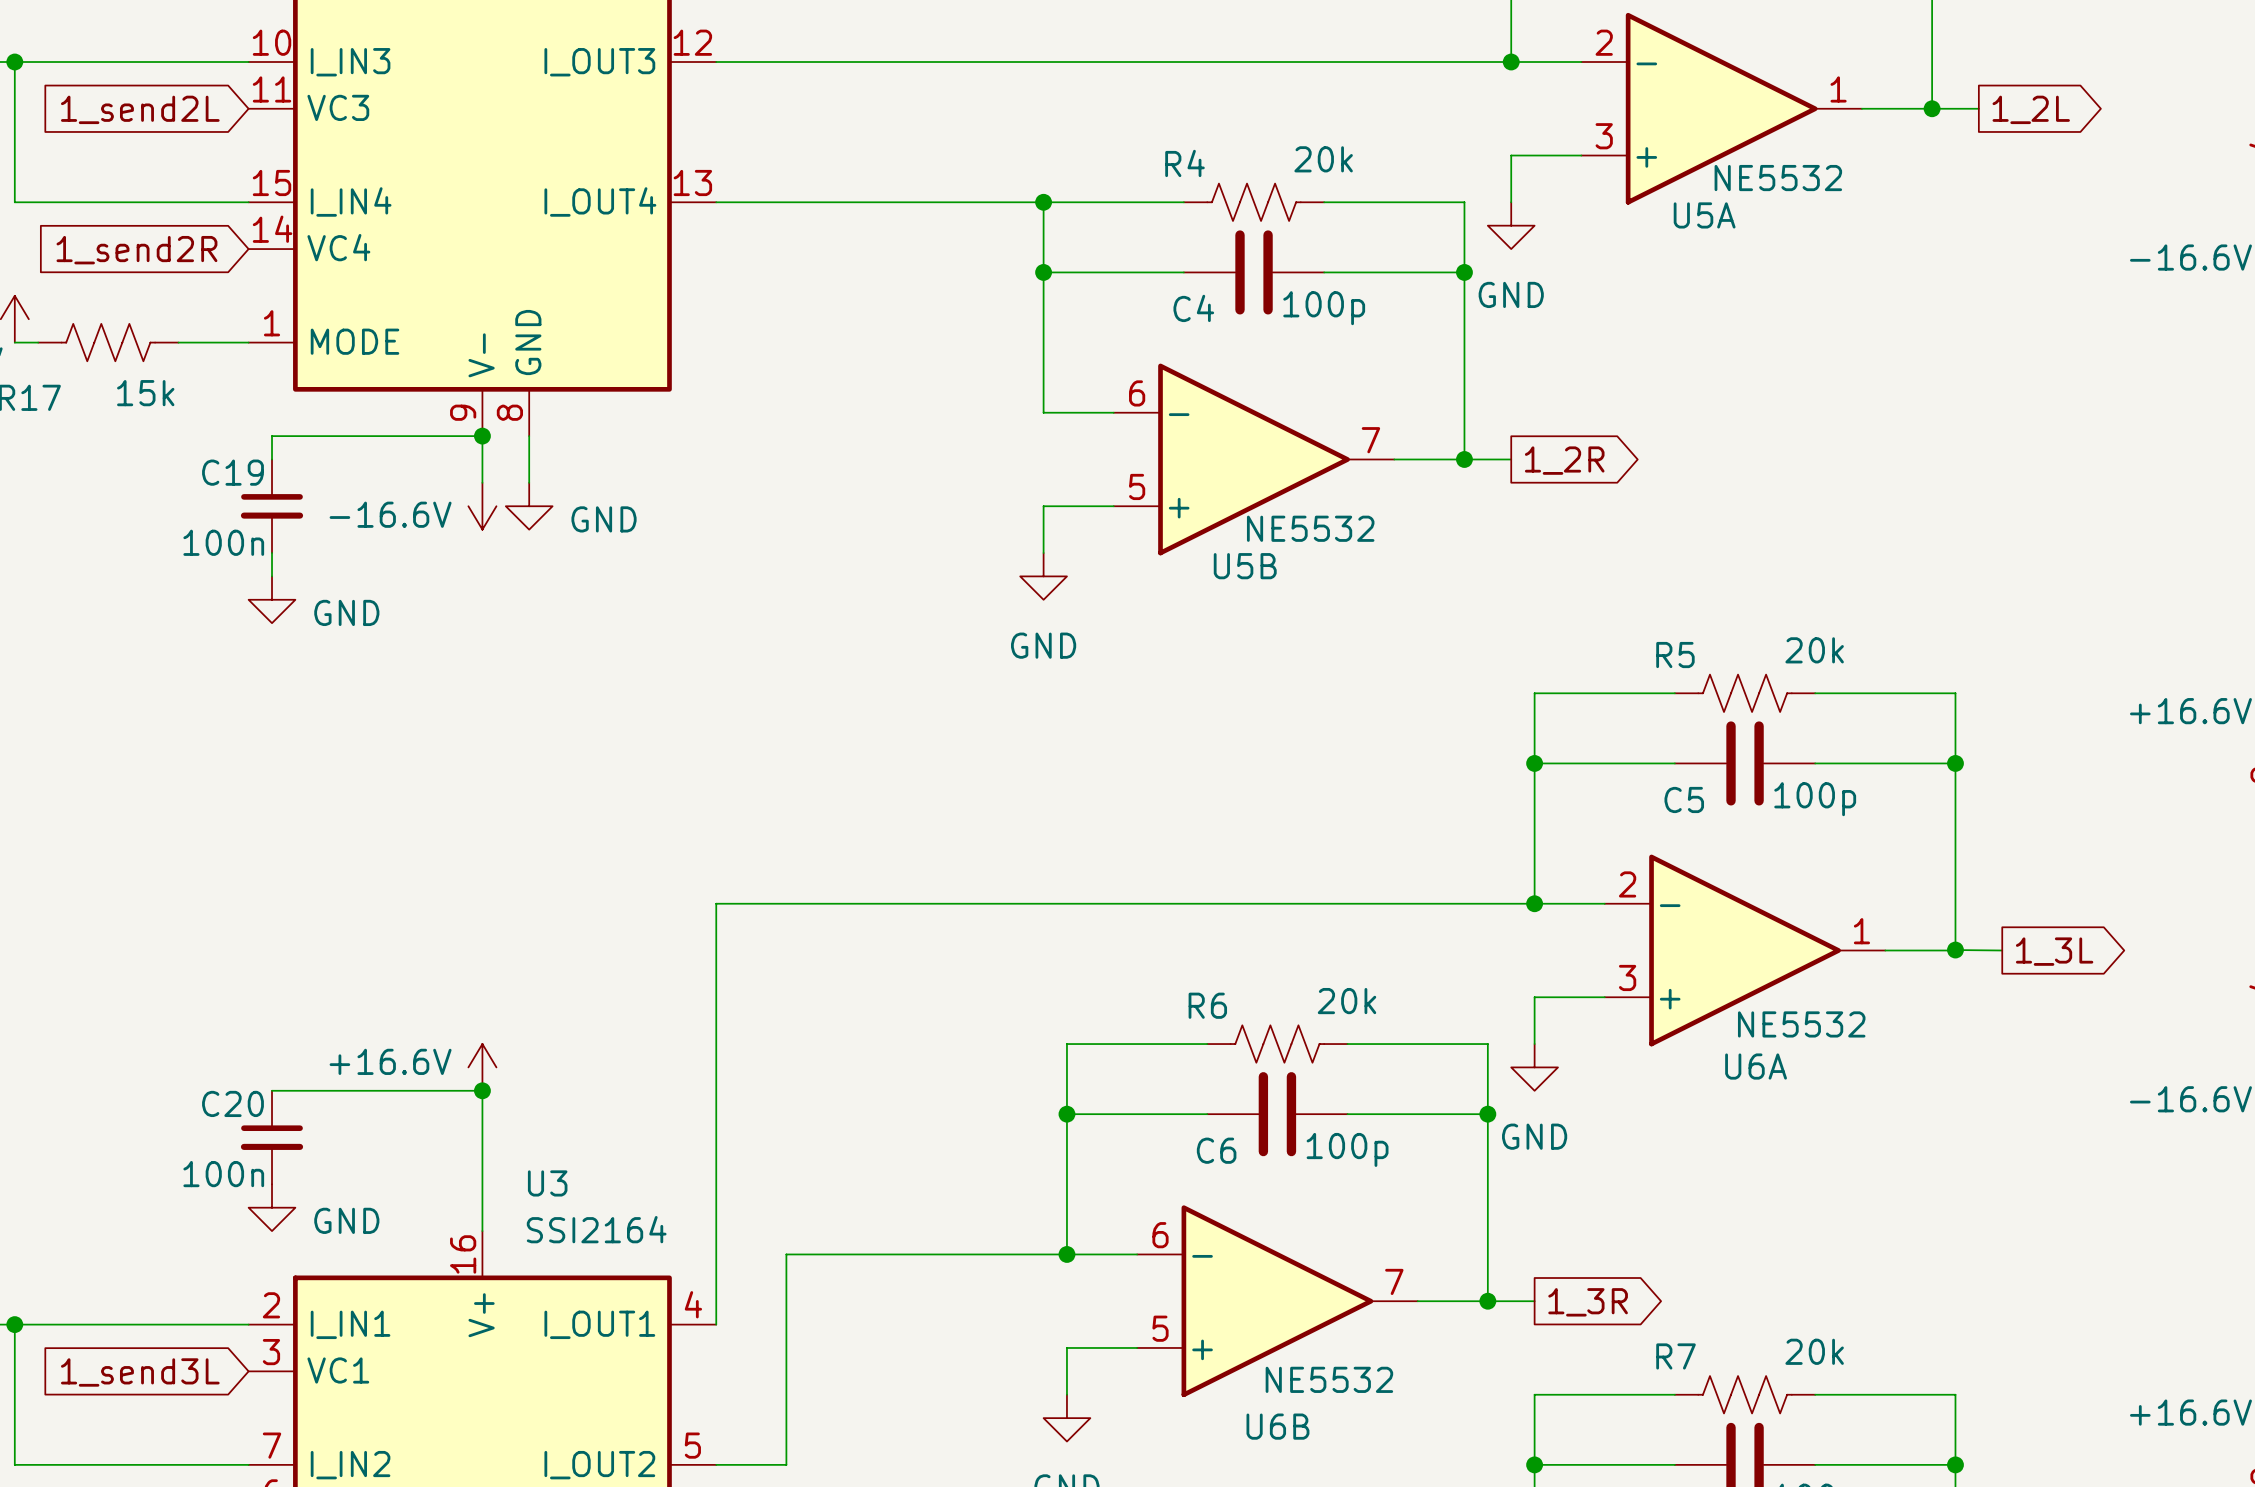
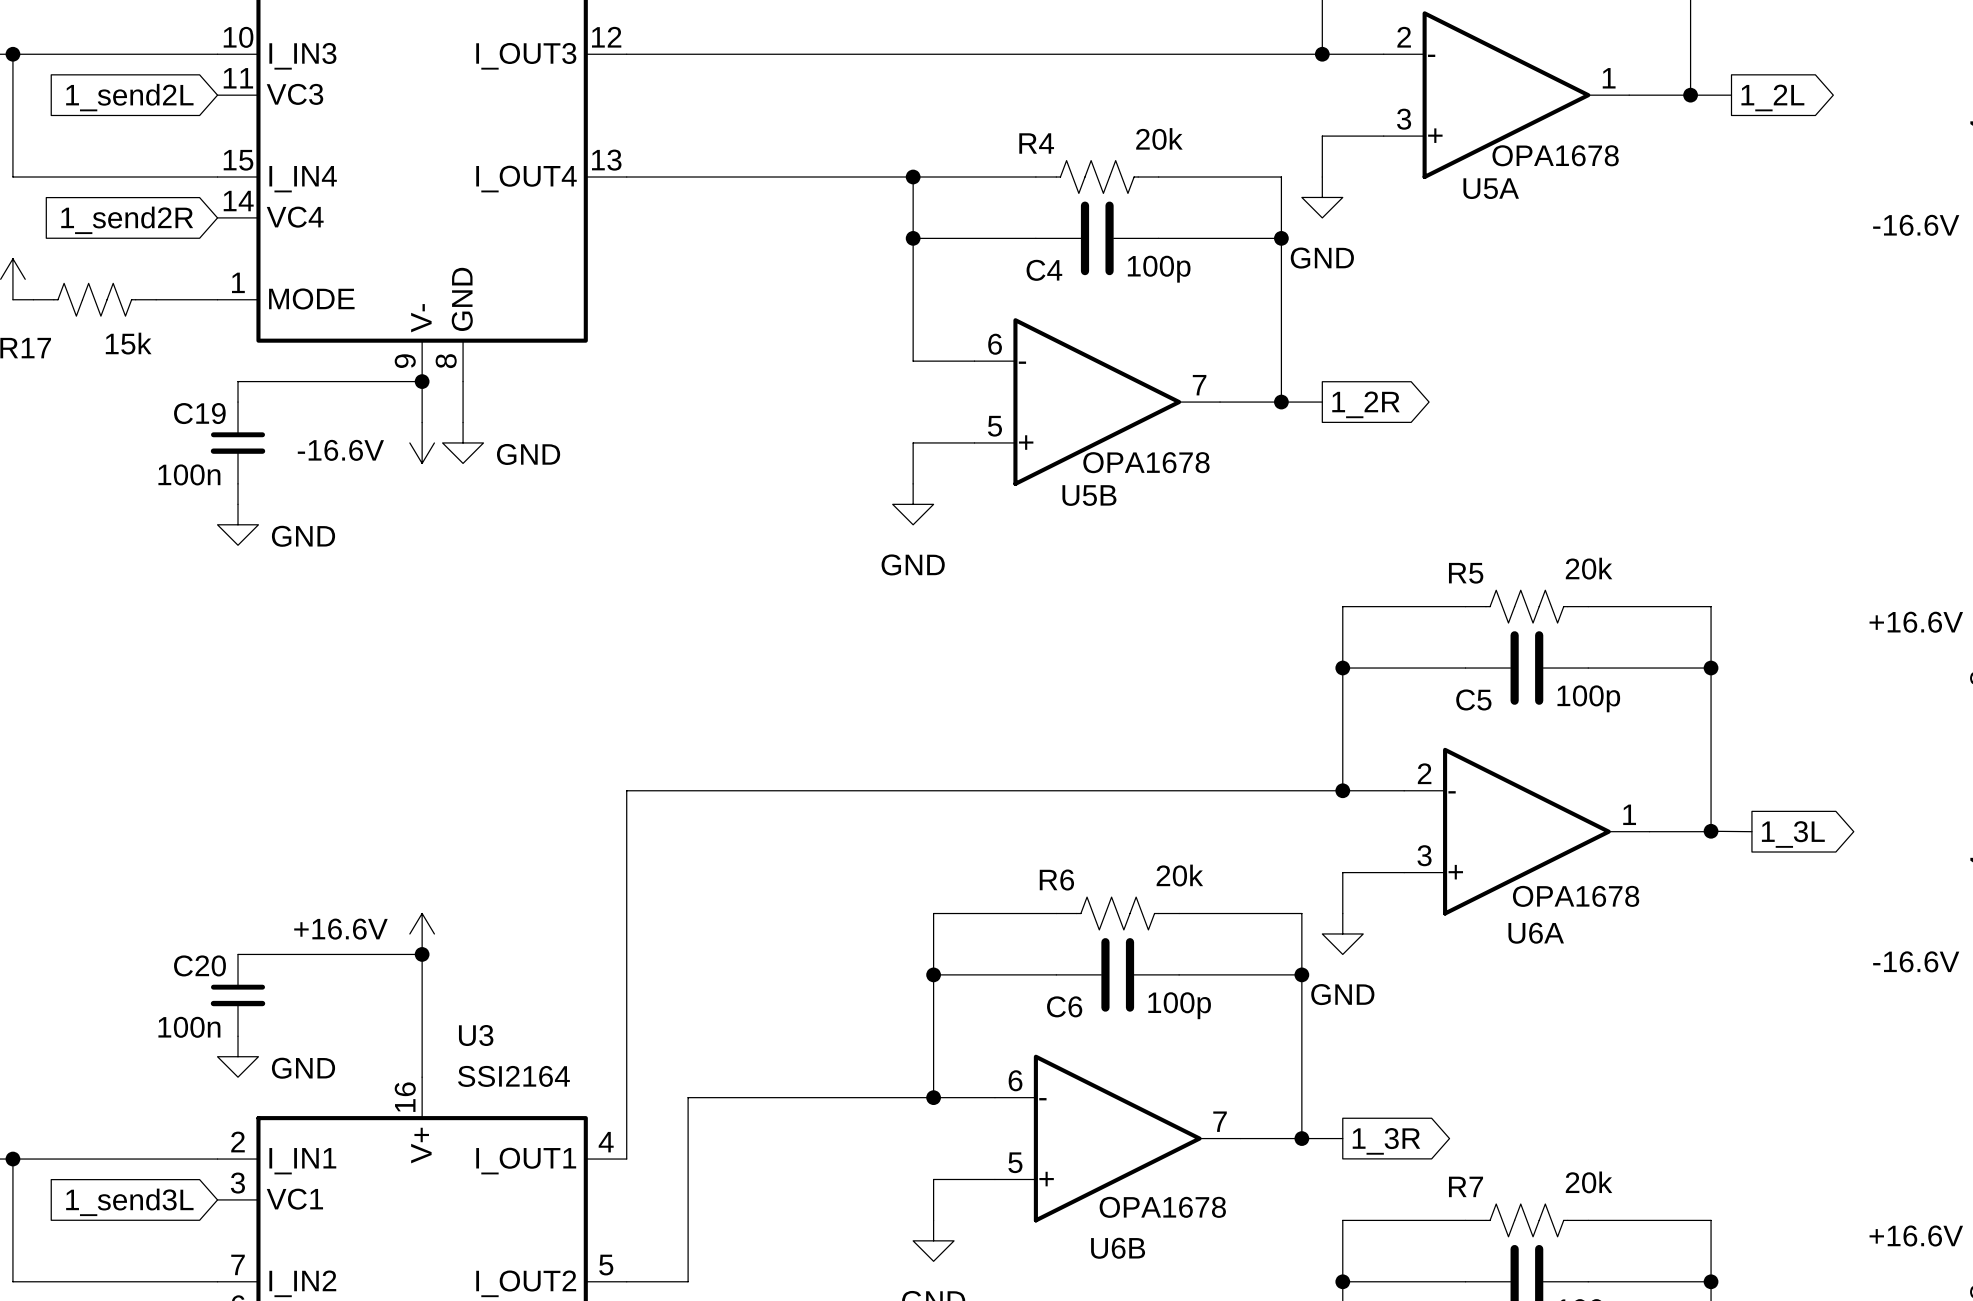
U5A value: NE5532 (1778, 178) -> OPA1678 (1555, 155)
U5B value: NE5532 (1310, 528) -> OPA1678 (1146, 462)
U6A value: NE5532 (1801, 1024) -> OPA1678 (1576, 896)
U6B value: NE5532 (1329, 1379) -> OPA1678 (1162, 1207)

